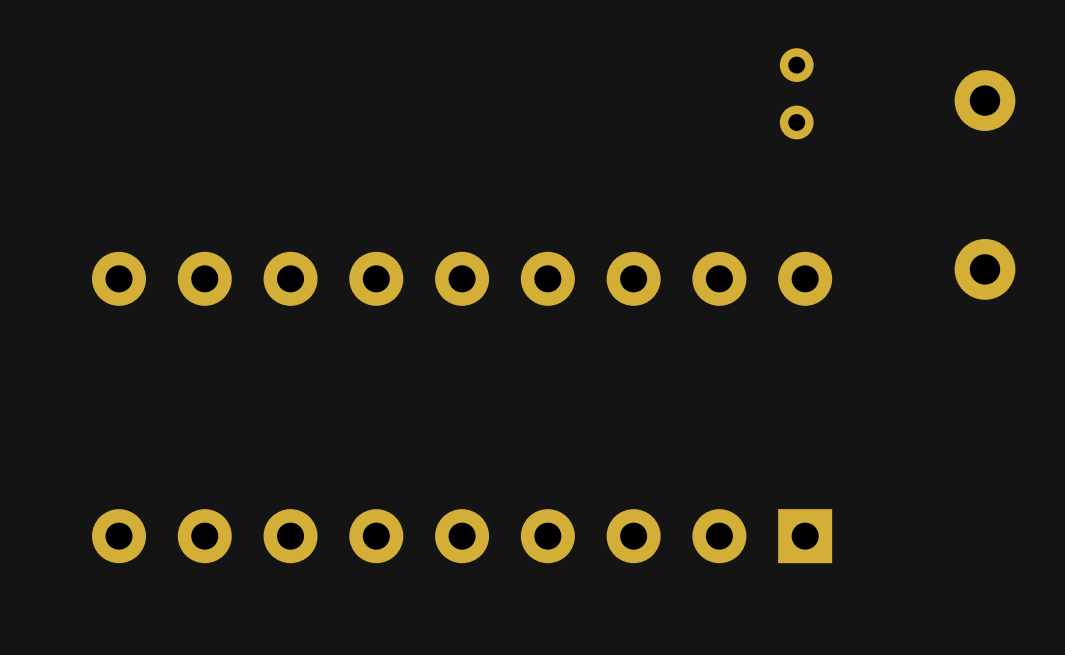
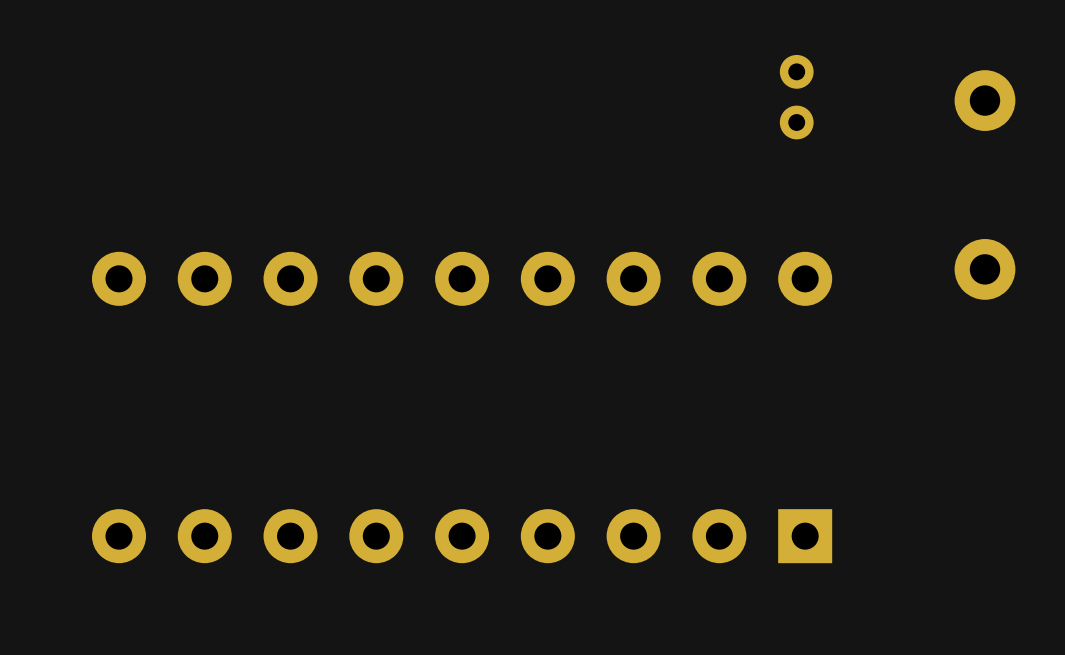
part footprint: [779, 48, 814, 140] -> [779, 54, 814, 140]

